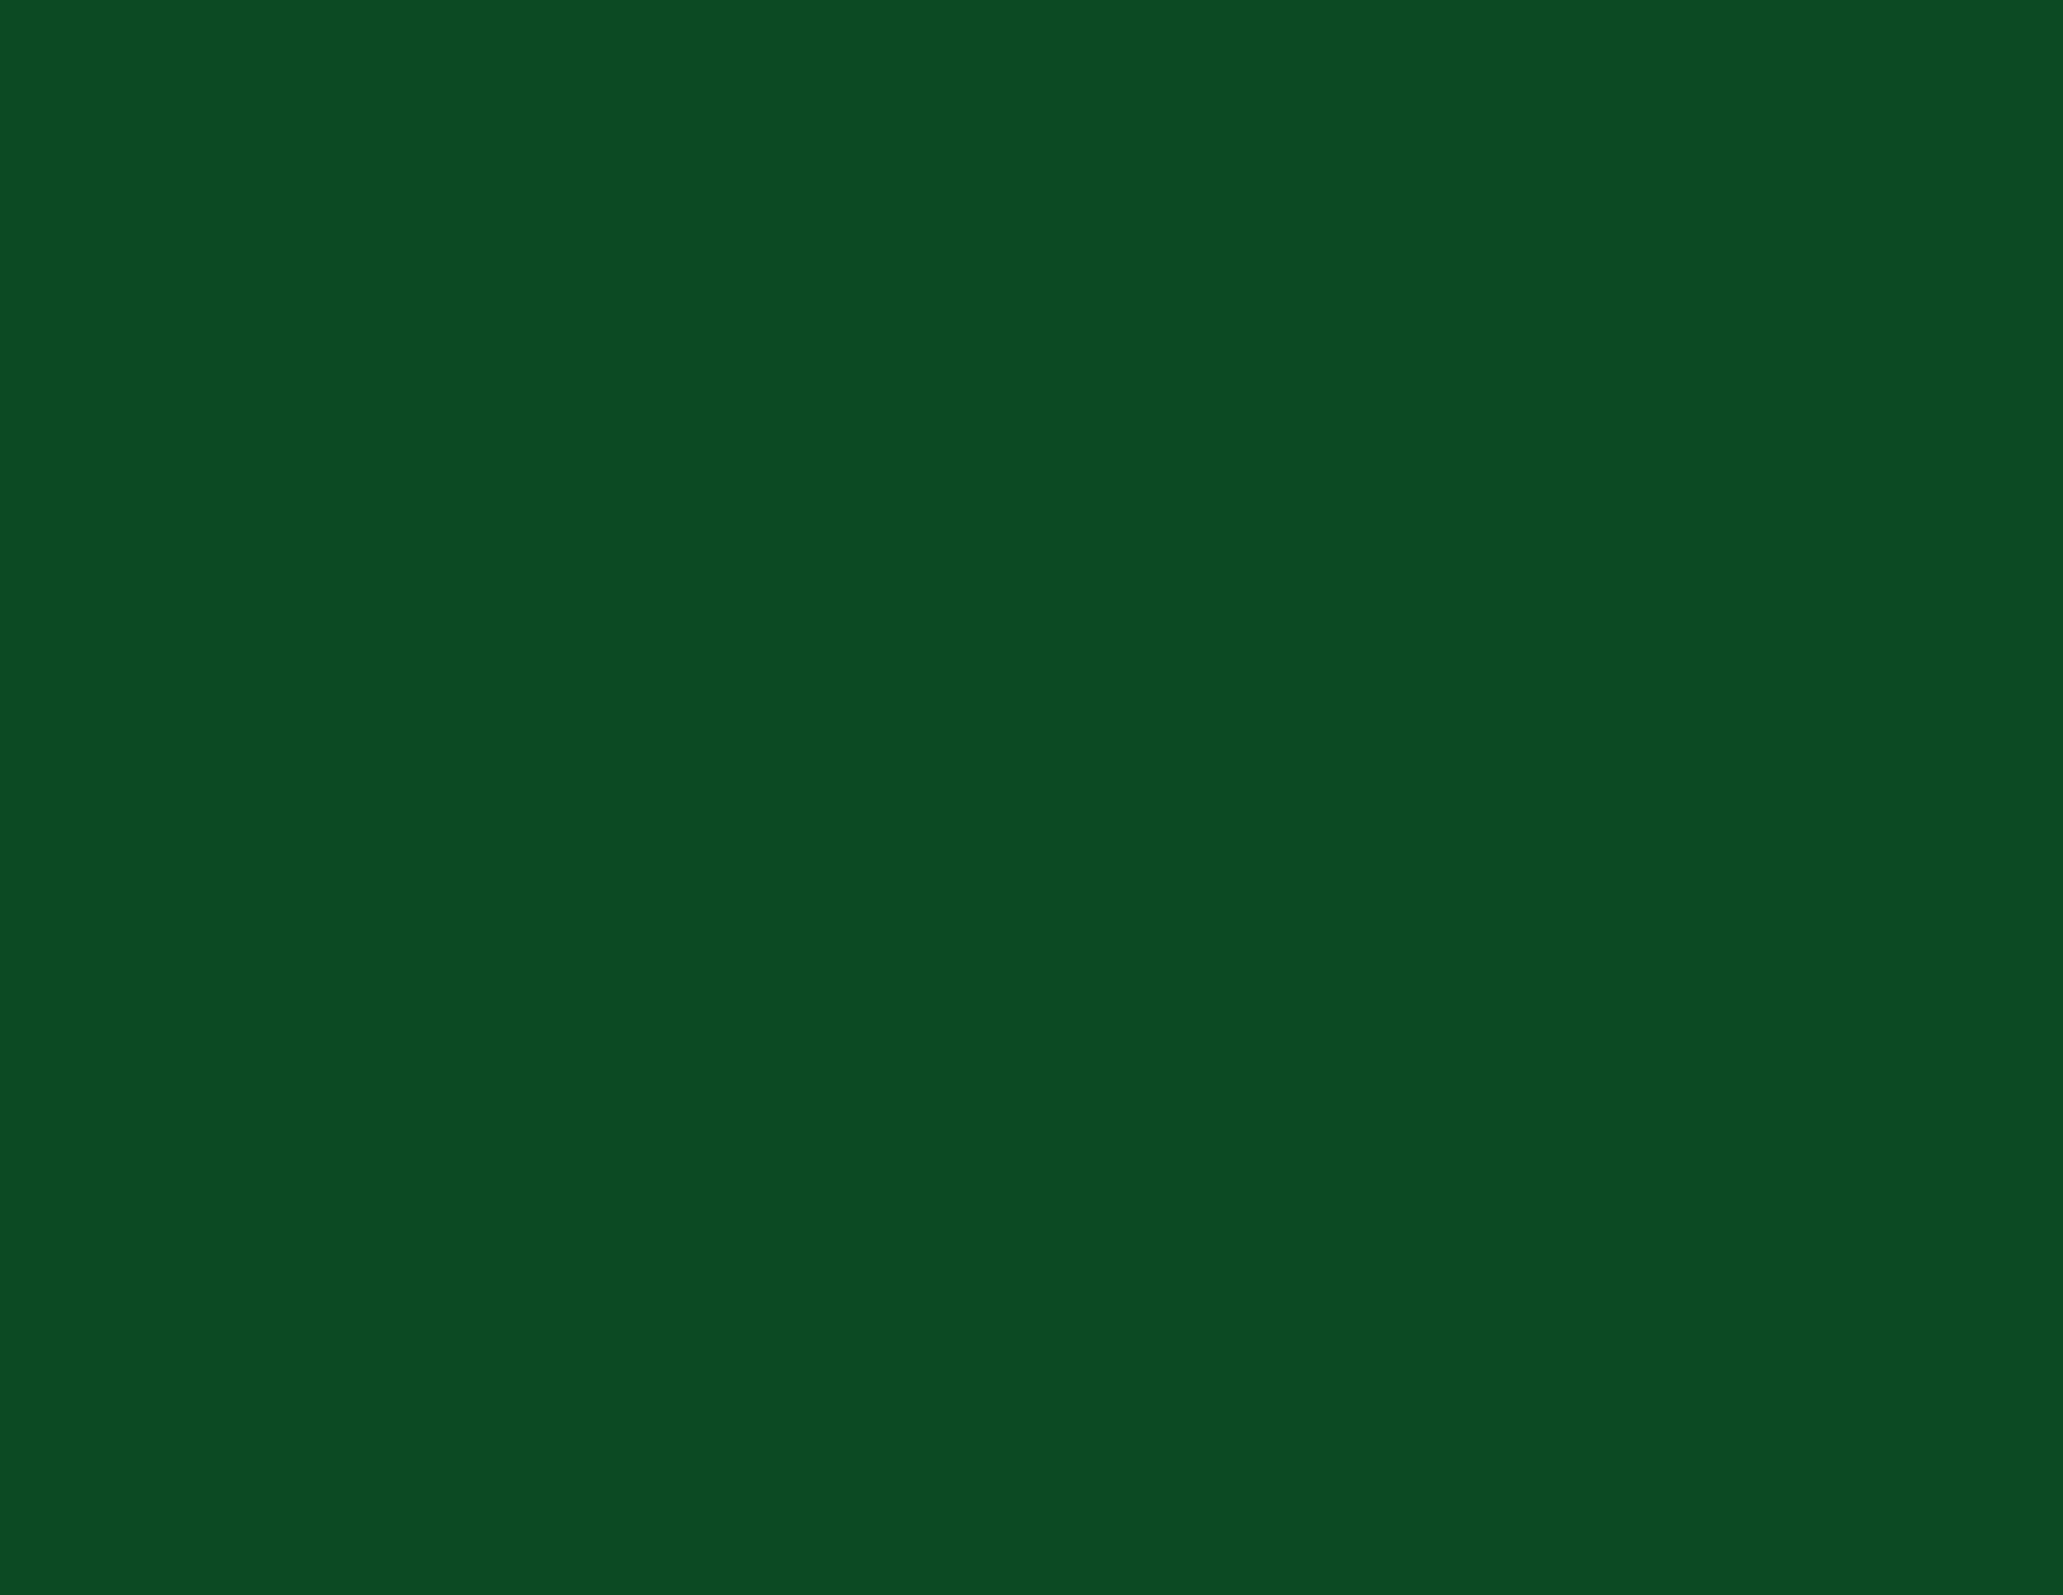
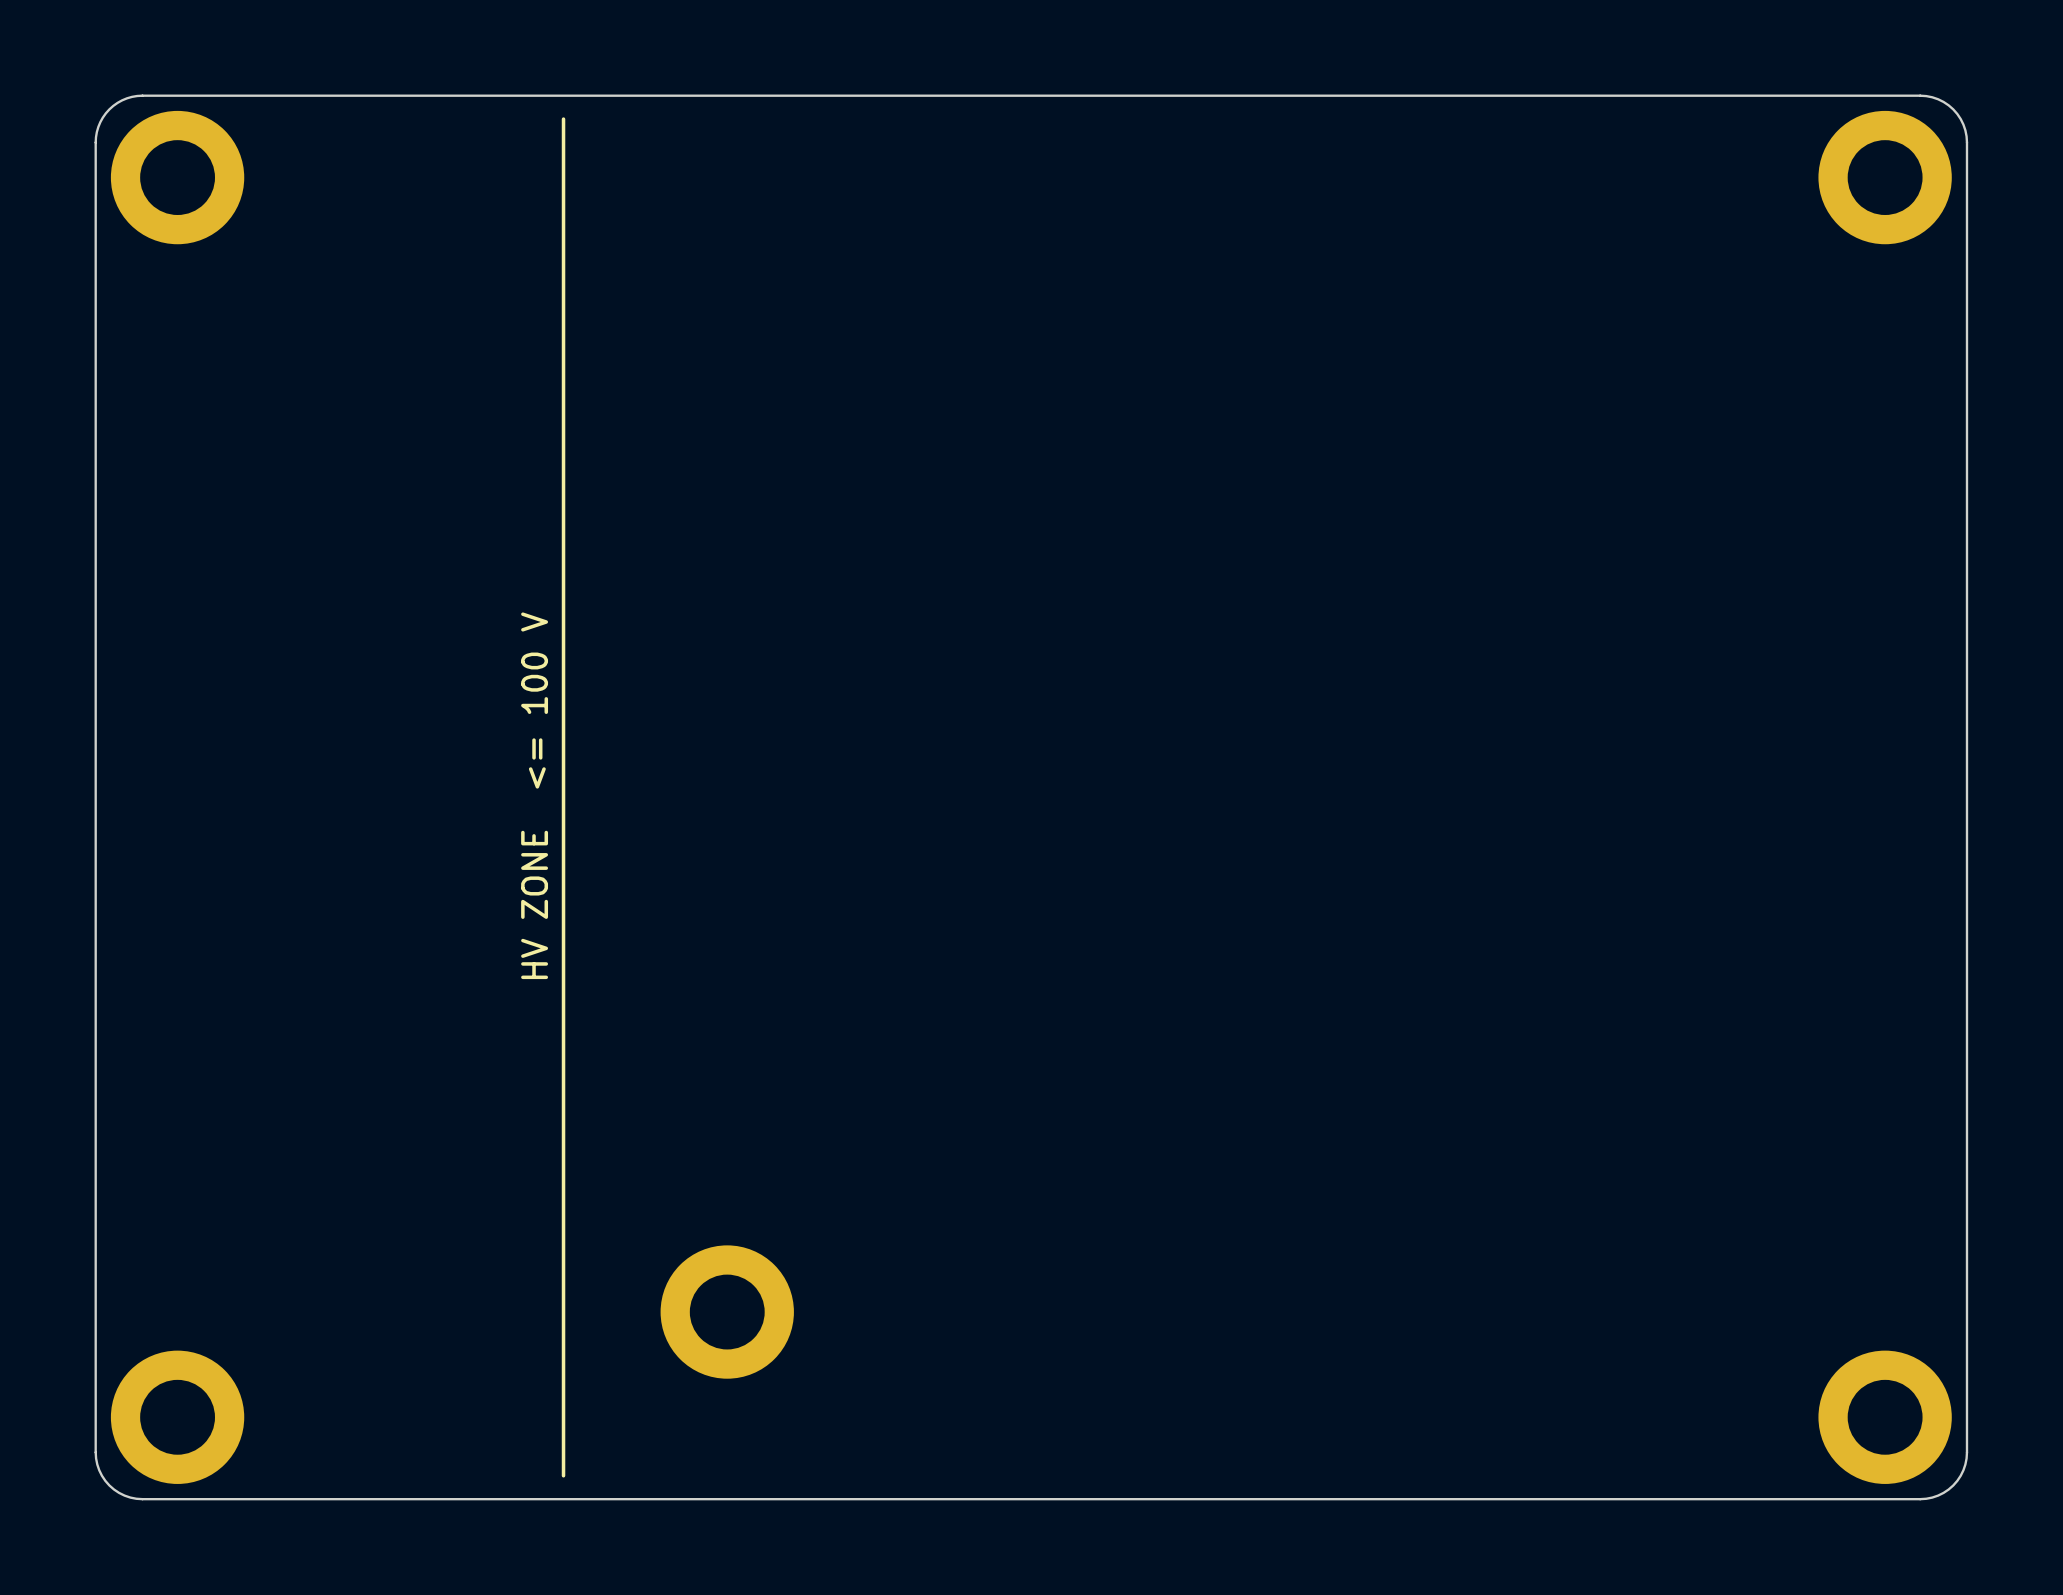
board edge: none -> (142, 95) (1920, 95) (1932, 97) (1948, 105) (1960, 119) (1965, 130) (1966, 142) (1966, 1452) (1965, 1464) (1957, 1480) (1943, 1492) (1932, 1497) (1920, 1499) (142, 1499) (124, 1495) (114, 1489) (101, 1475) (97, 1464) (95, 1452) (95, 142) (98, 127) (109, 109) (122, 100) (142, 95)
line: none -> (563, 119) (563, 1475)
part: none -> (177, 177)
part: none -> (1885, 177)
text: none -> HV ZONE <= 100 V (534, 795)
part: none -> (727, 1312)
part: none -> (177, 1417)
part: none -> (1885, 1417)

